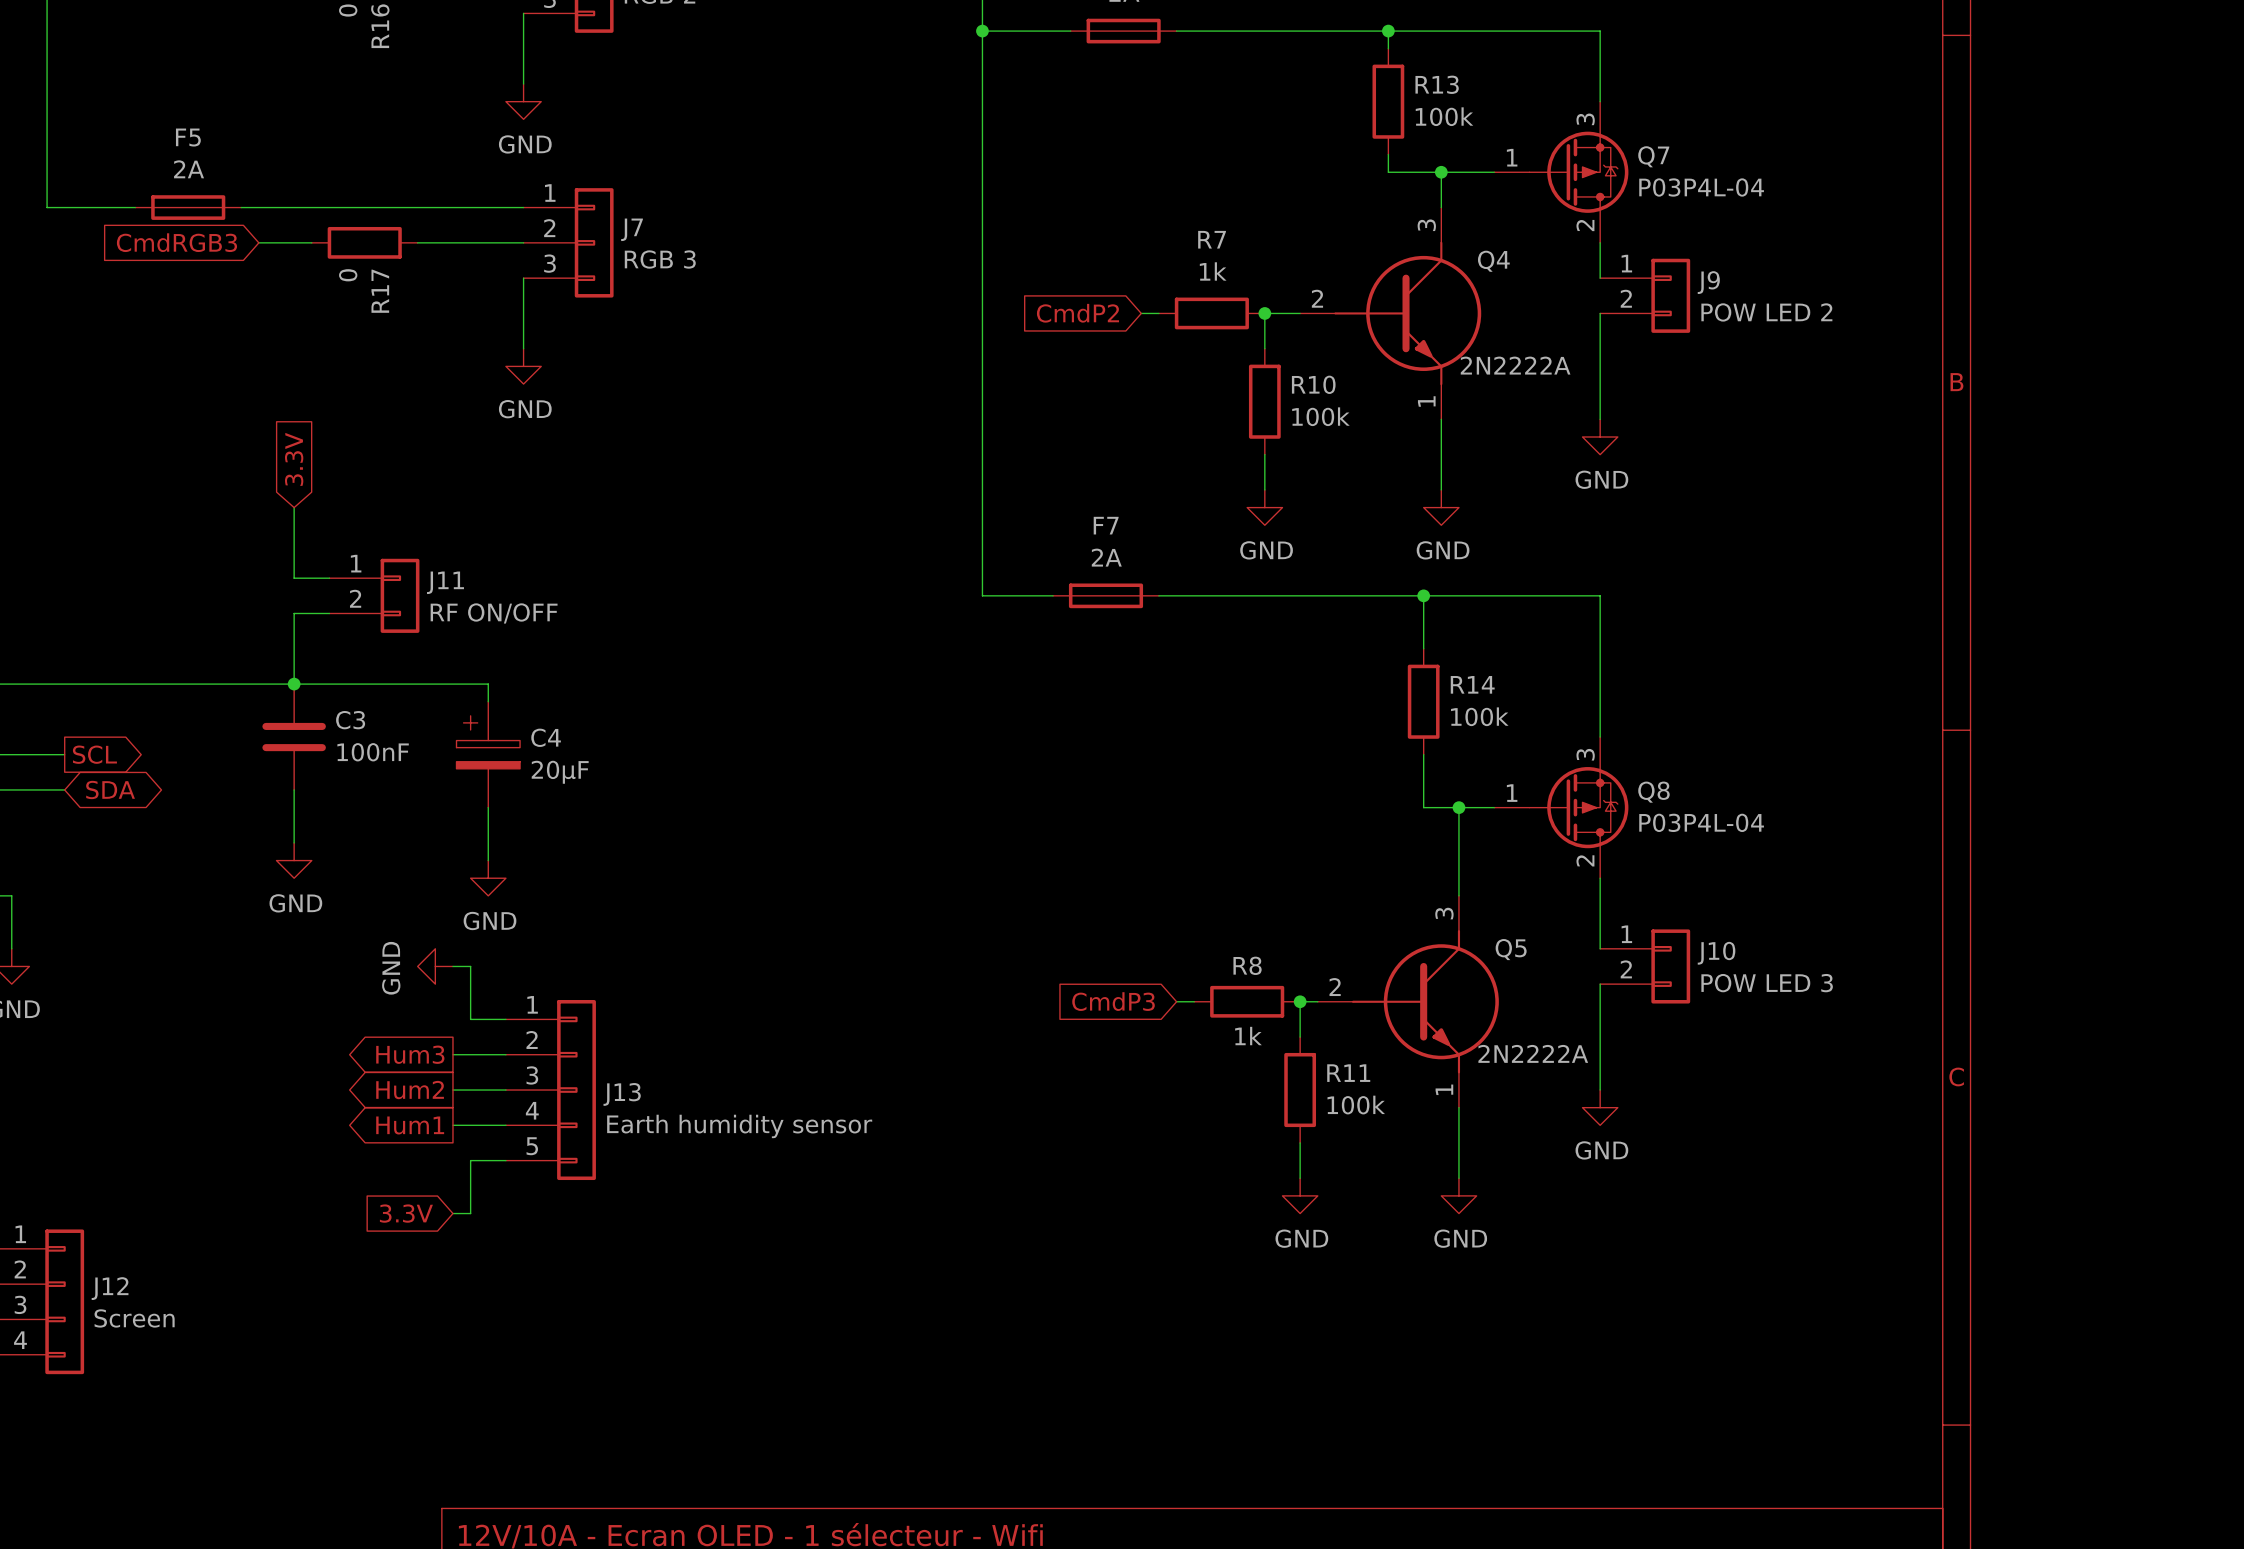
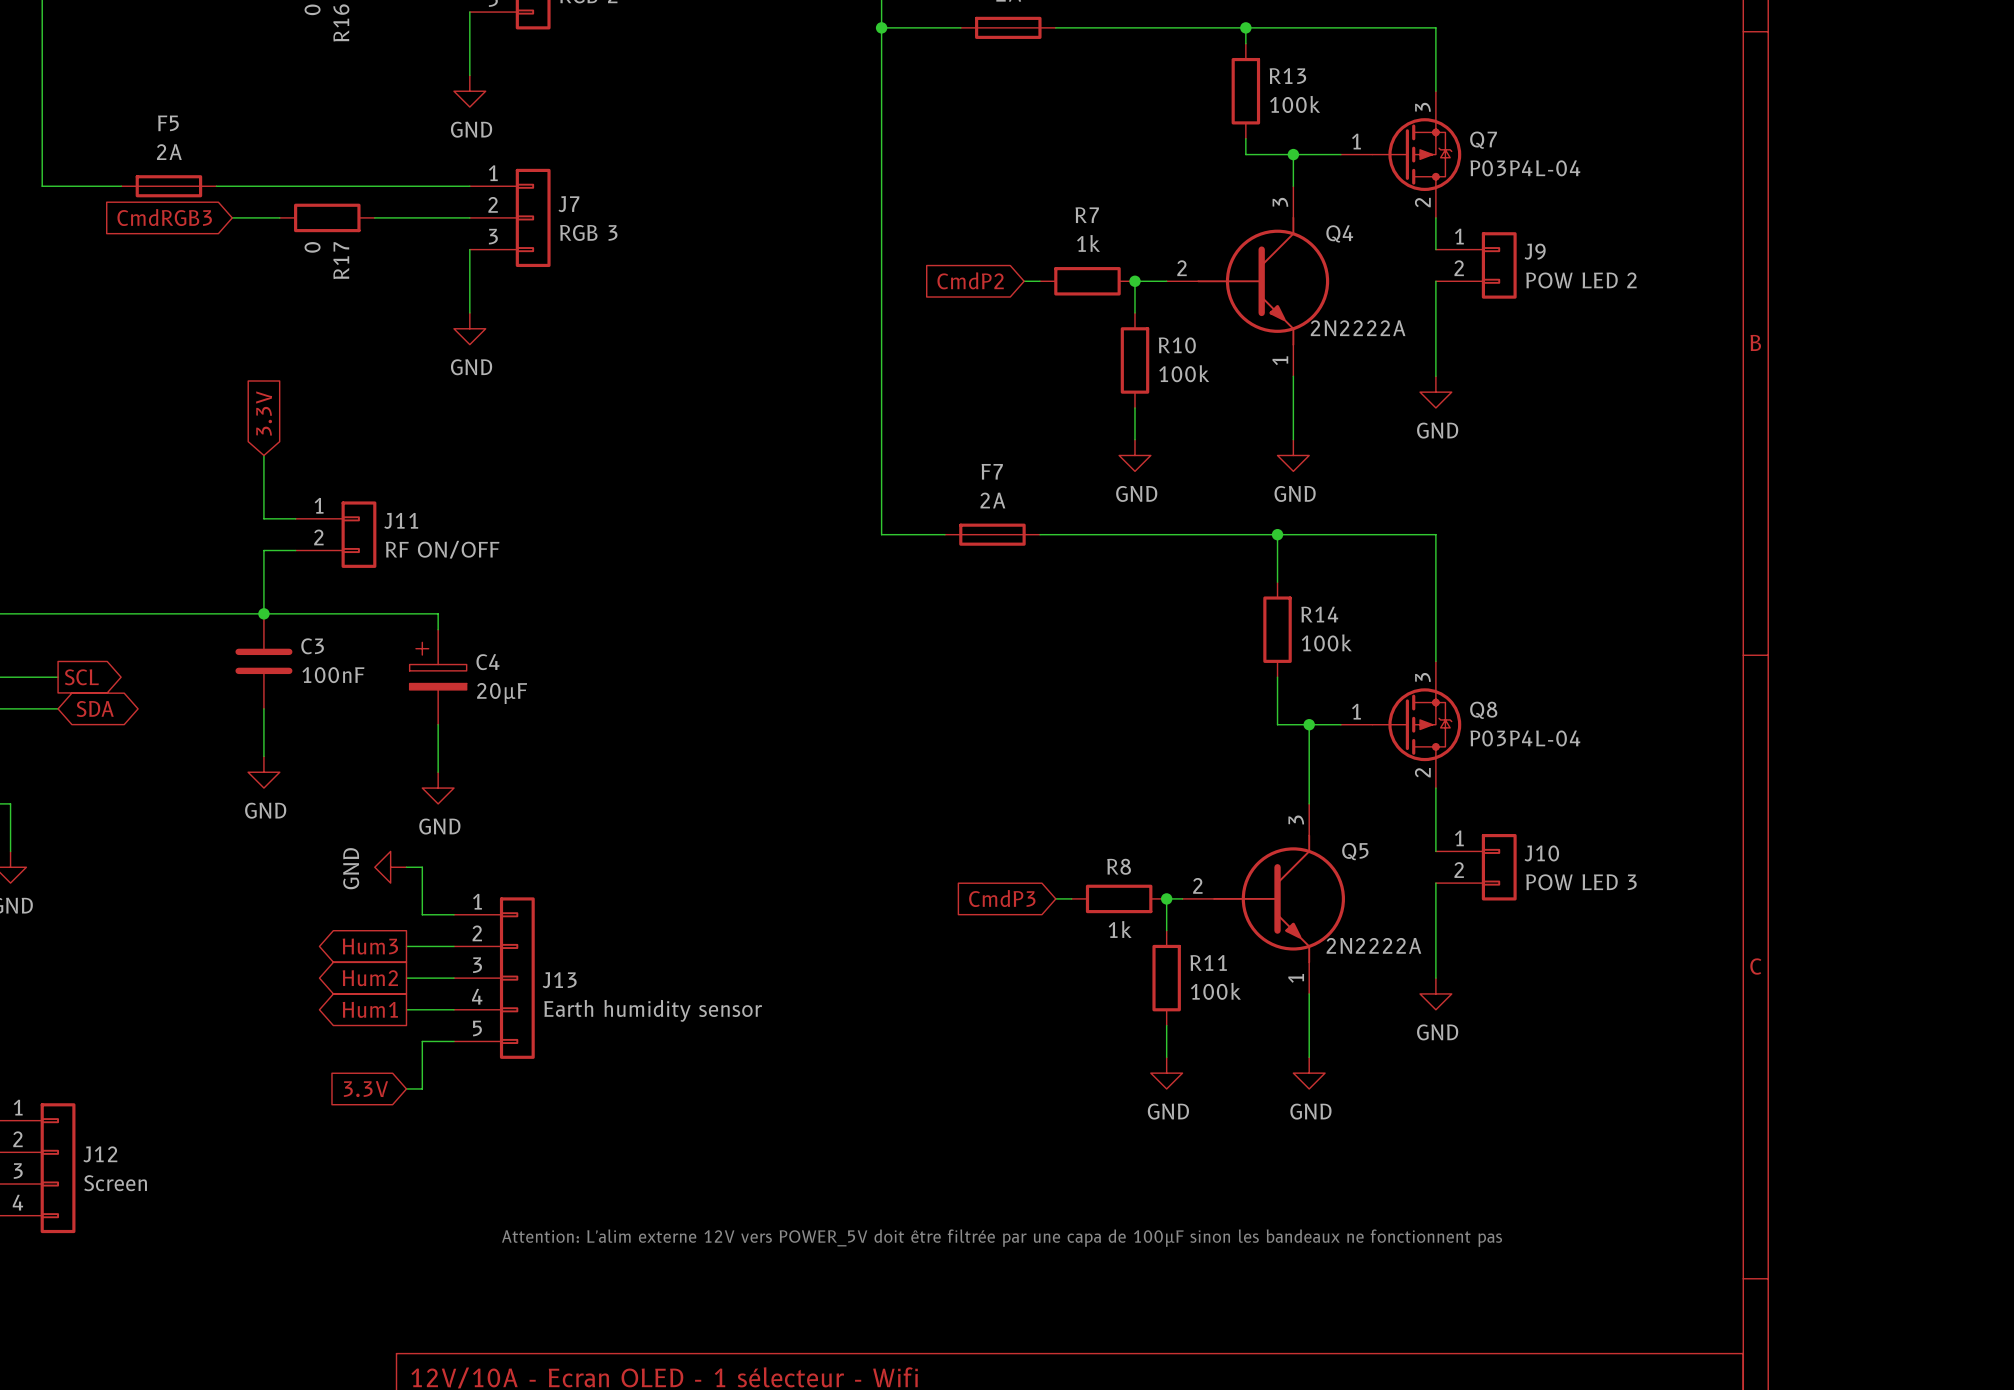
text: none -> Attention: L'alim externe 12V vers POWER_5V doit être filtrée par une capa de 100µF sinon les bandeaux ne fonctionnent pas (1002, 1238)

